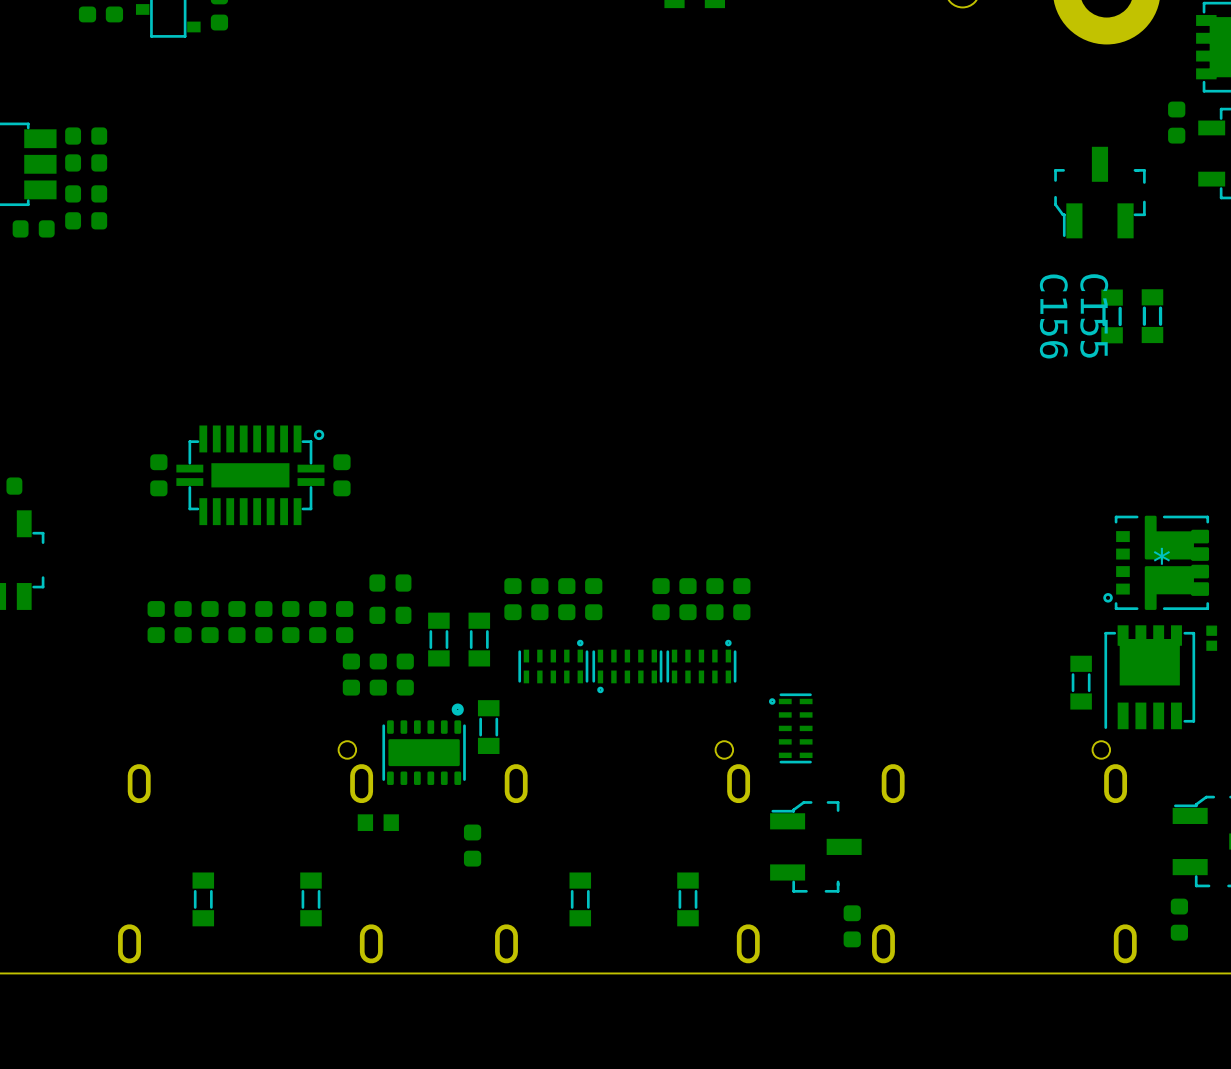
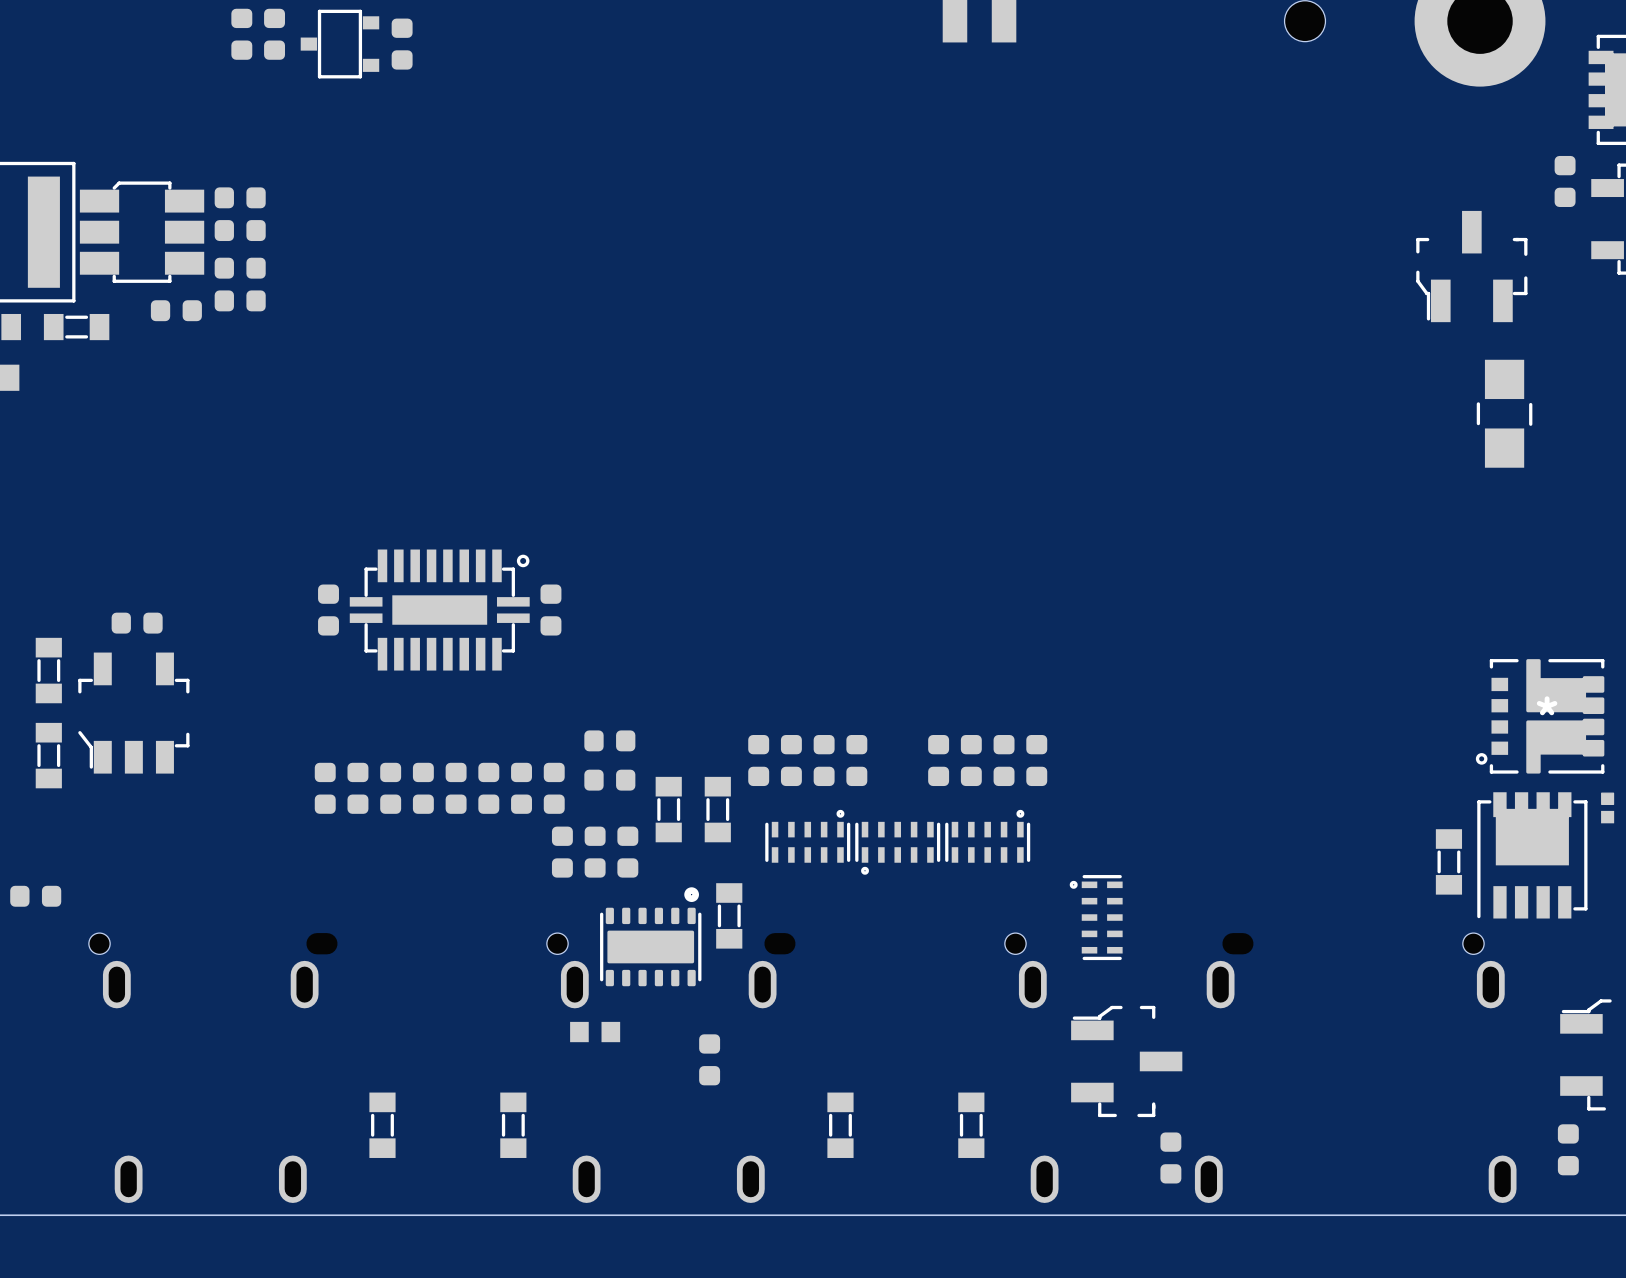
part: none -> (1504, 413)
C156: (1112, 316) -> none
C155: (1152, 316) -> none

